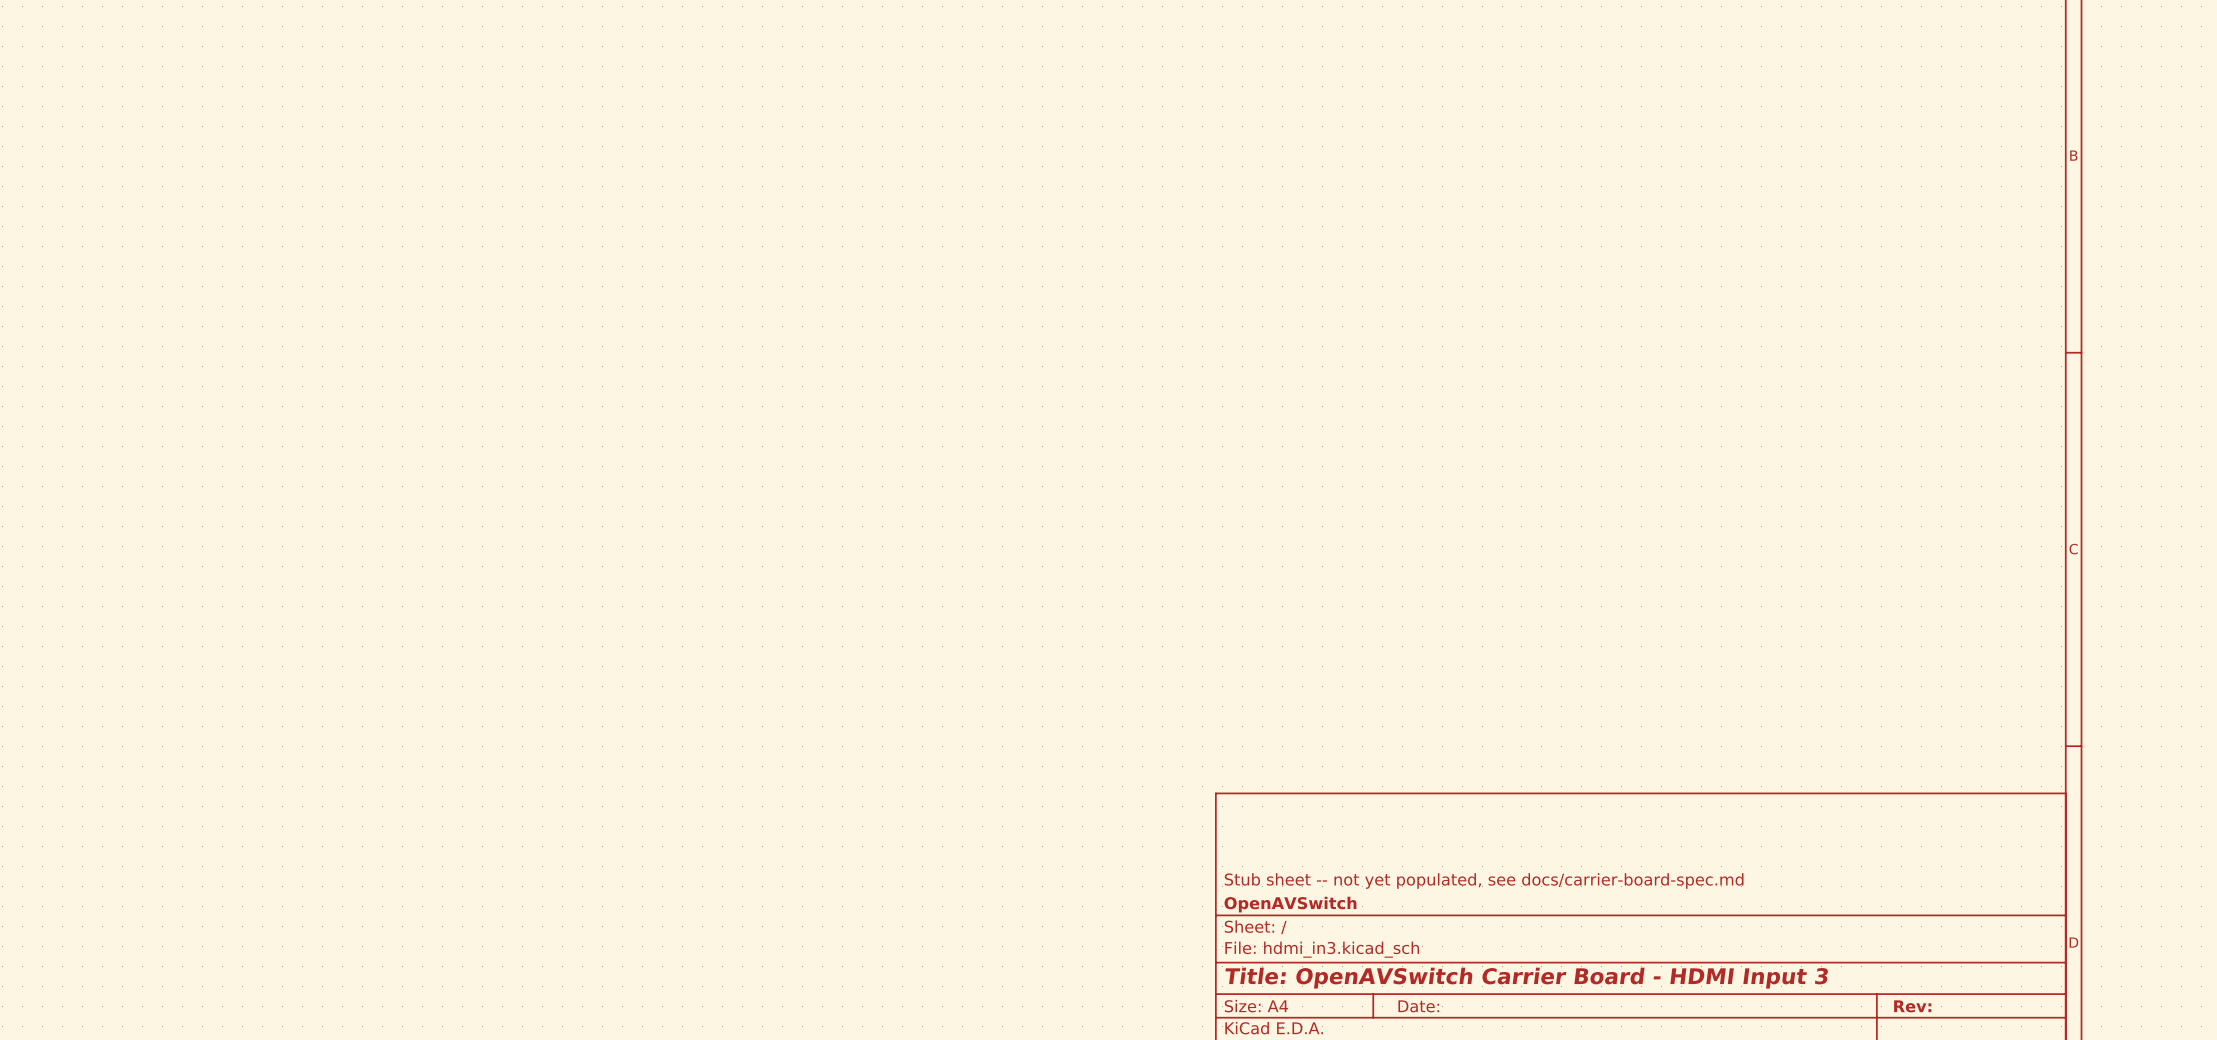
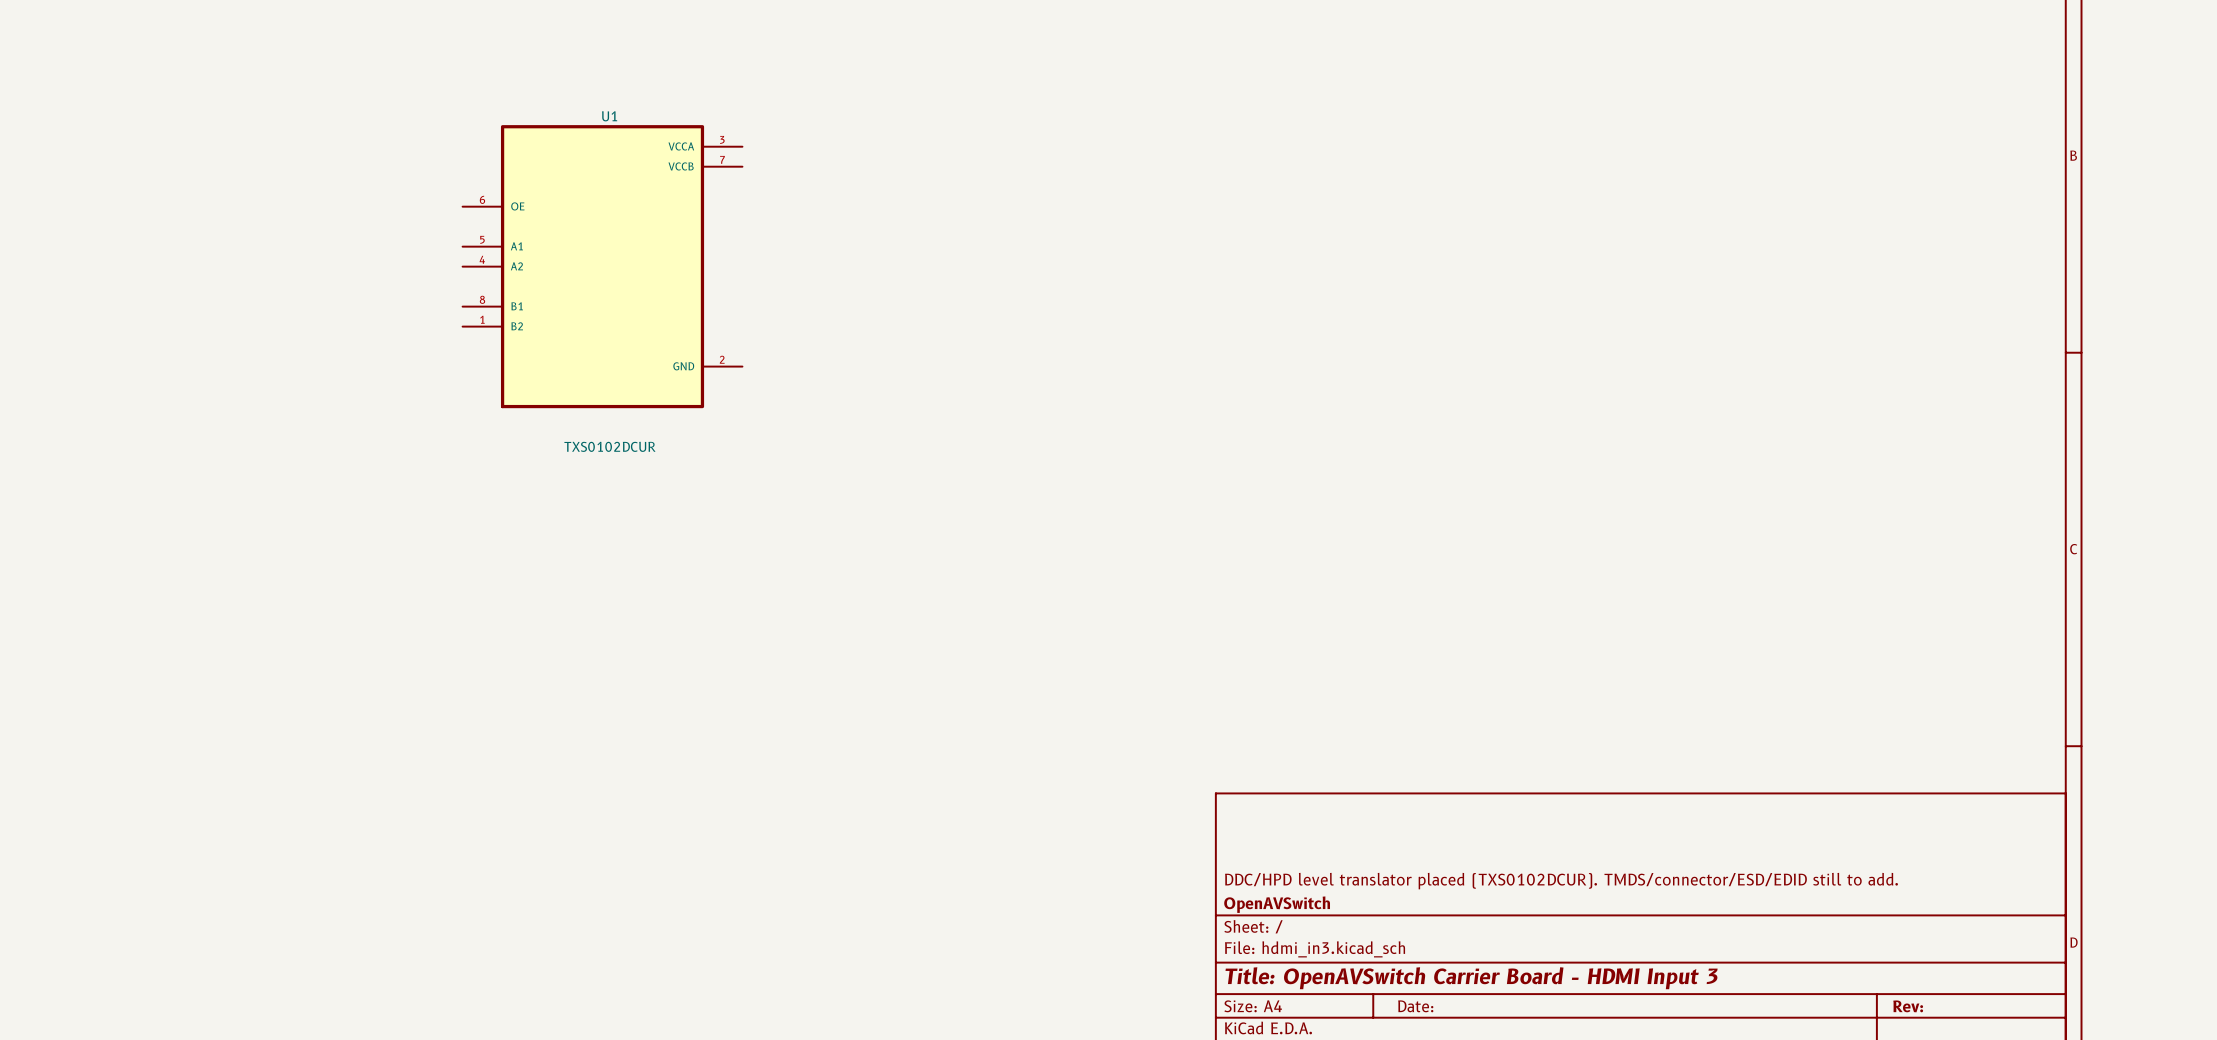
U1: none -> TXS0102DCUR (602, 266)
title block: Stub sheet -- not yet populated, see docs/carrier-board-spec.md (1484, 880) -> DDC/HPD level translator placed (TXS0102DCUR). TMDS/connector/ESD/EDID still to add. (1561, 881)

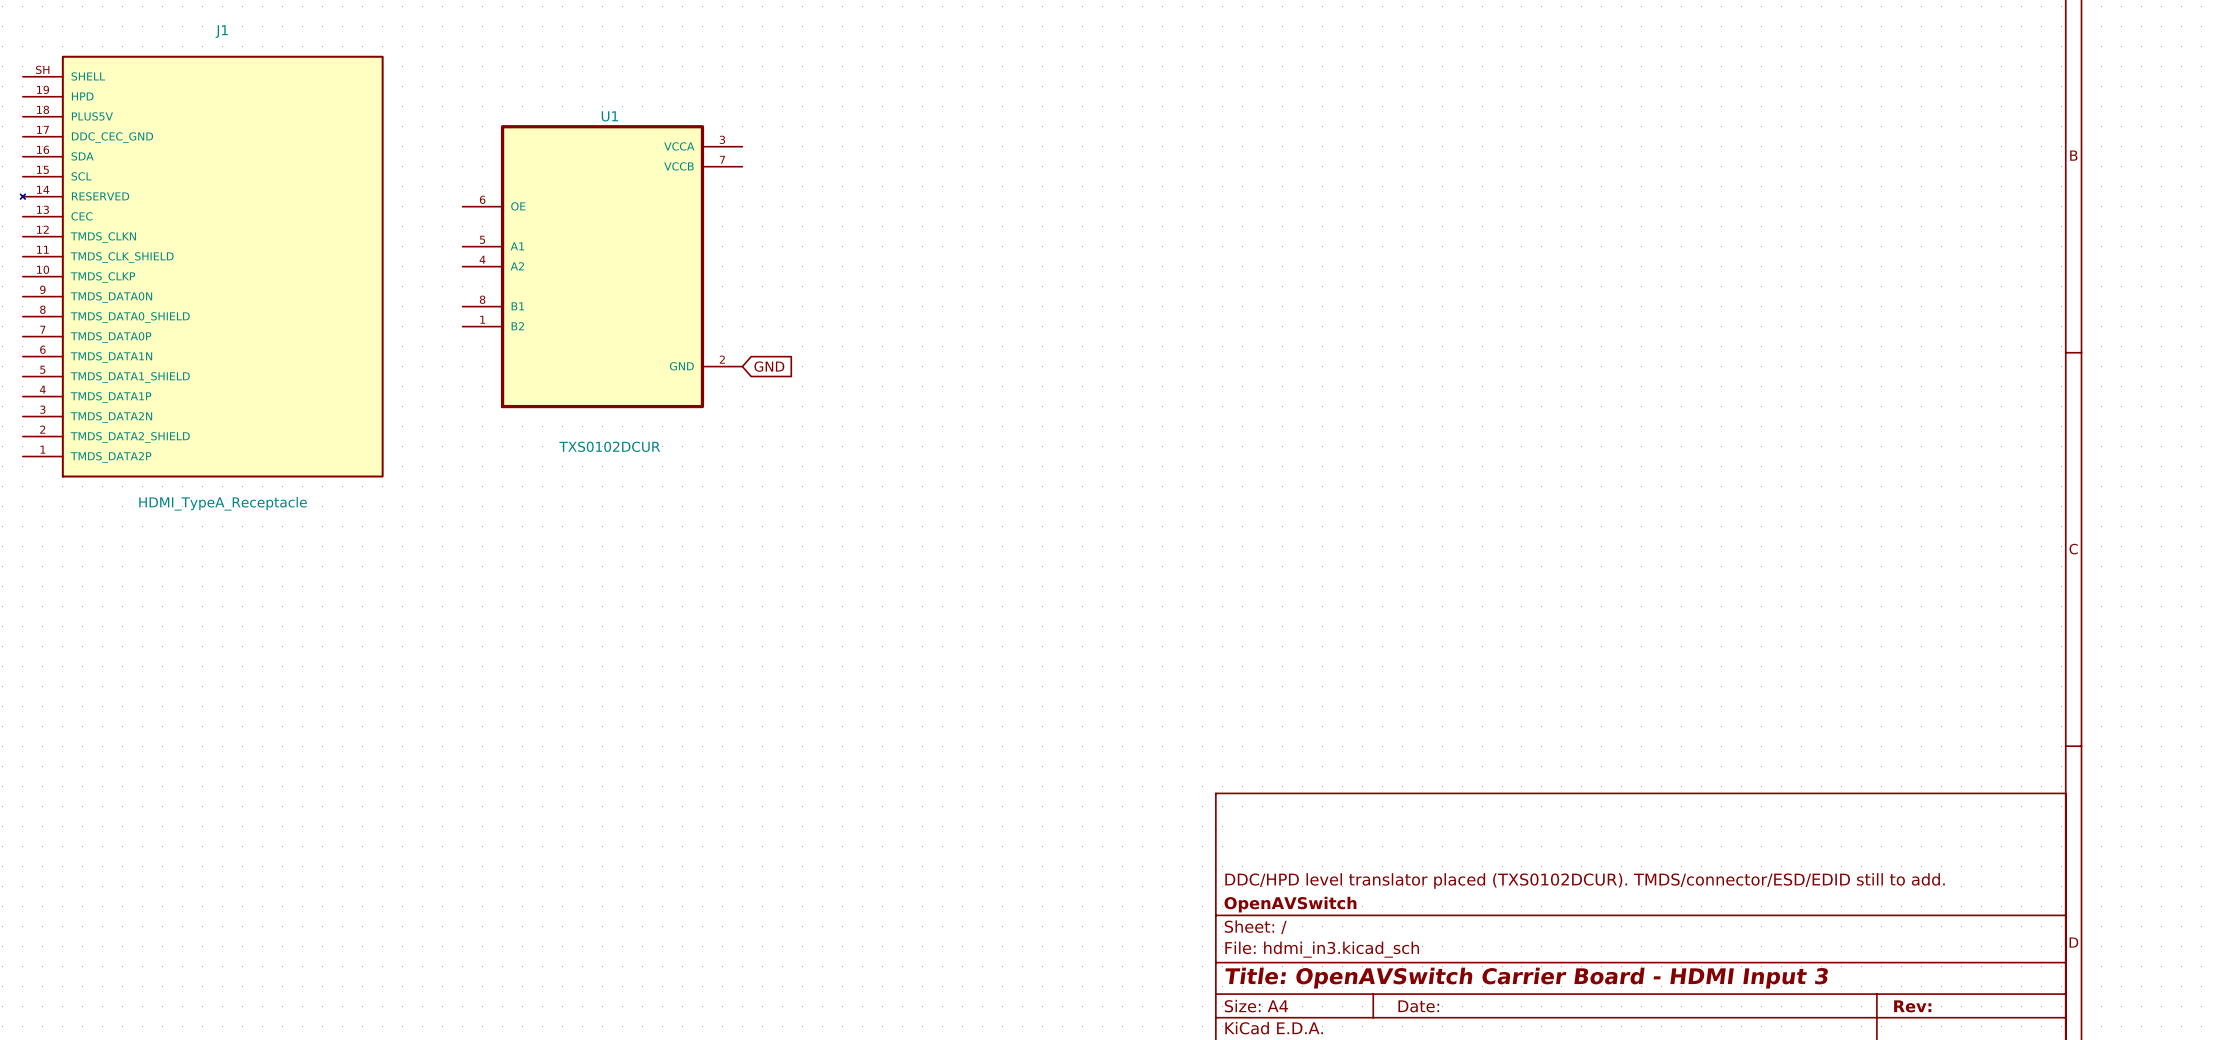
J1: none -> HDMI_TypeA_Receptacle (202, 266)
global label: none -> GND (769, 366)

